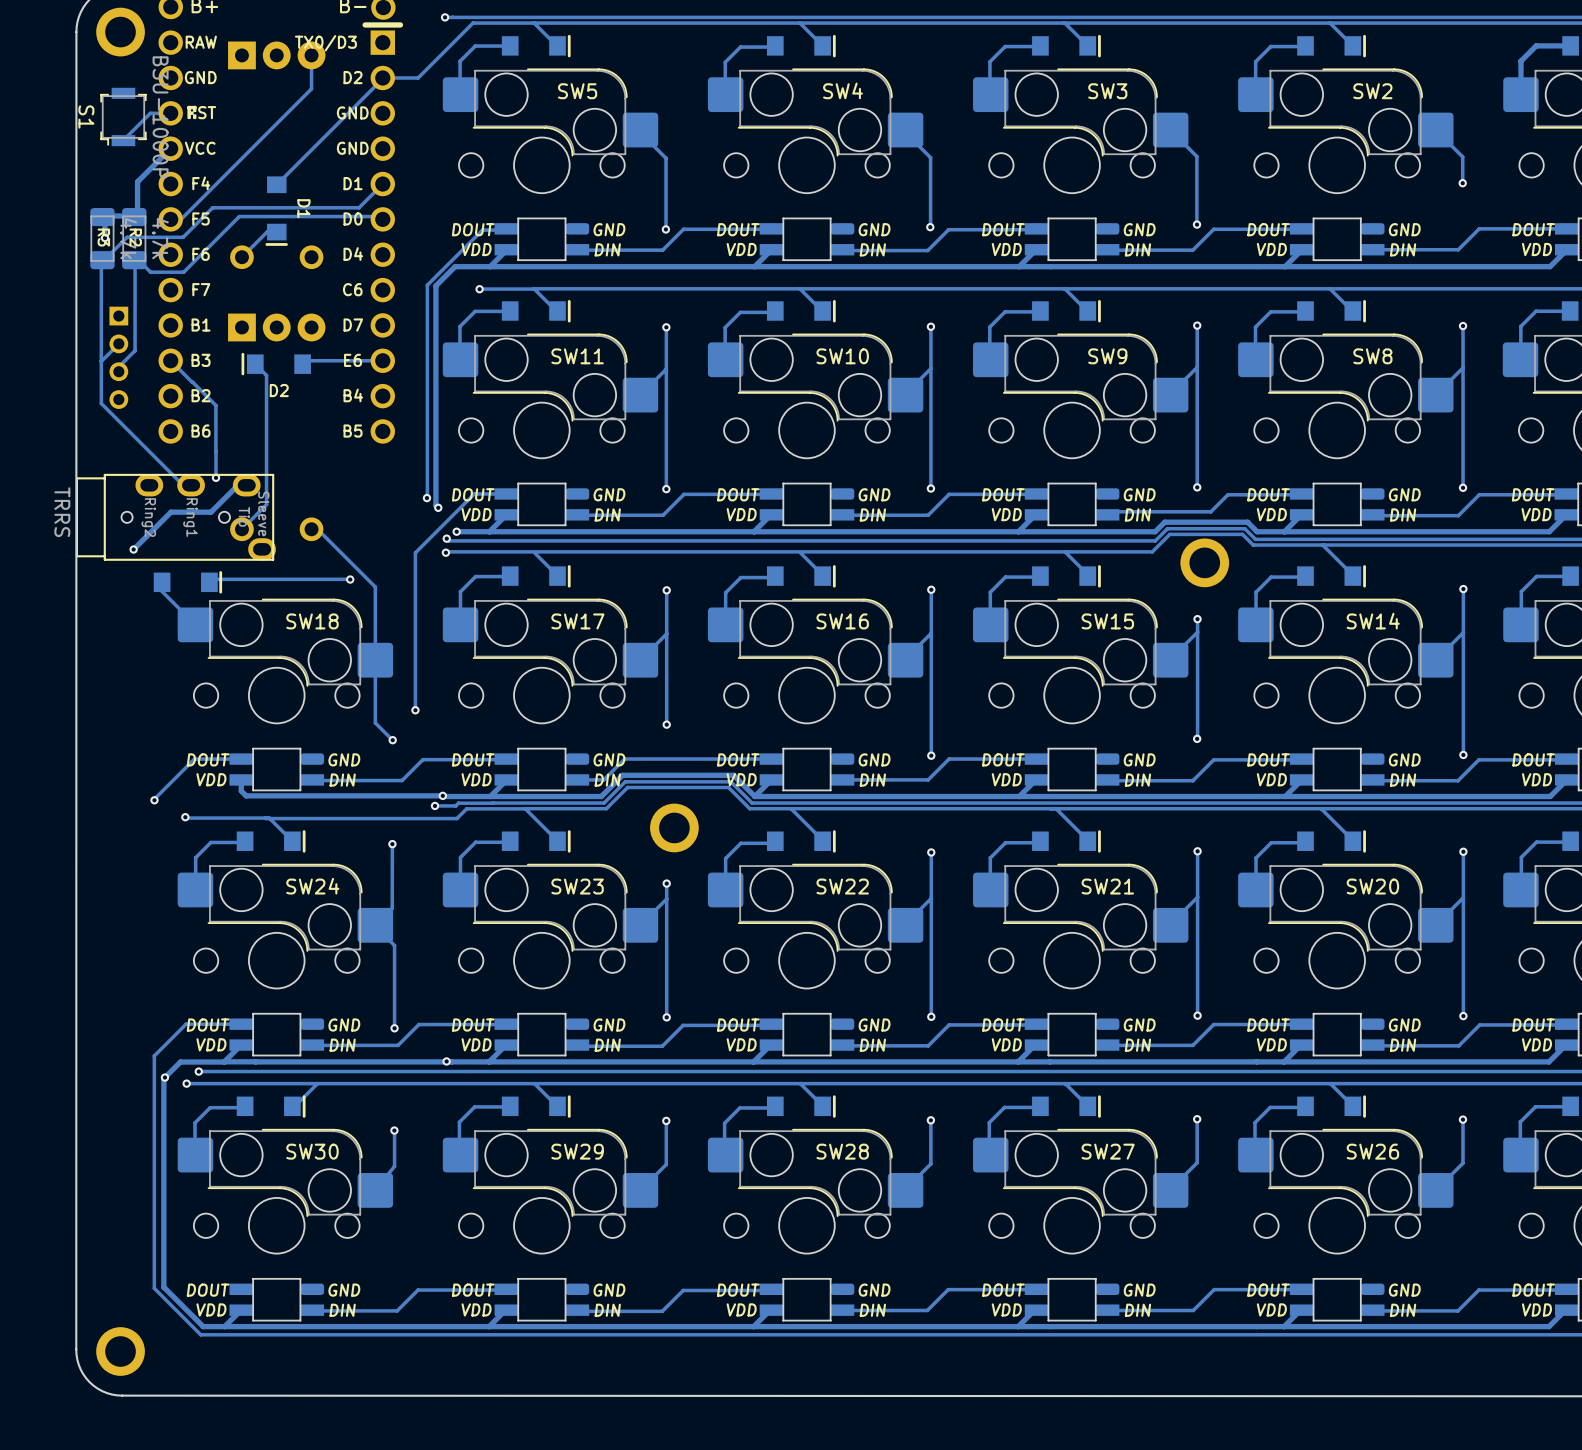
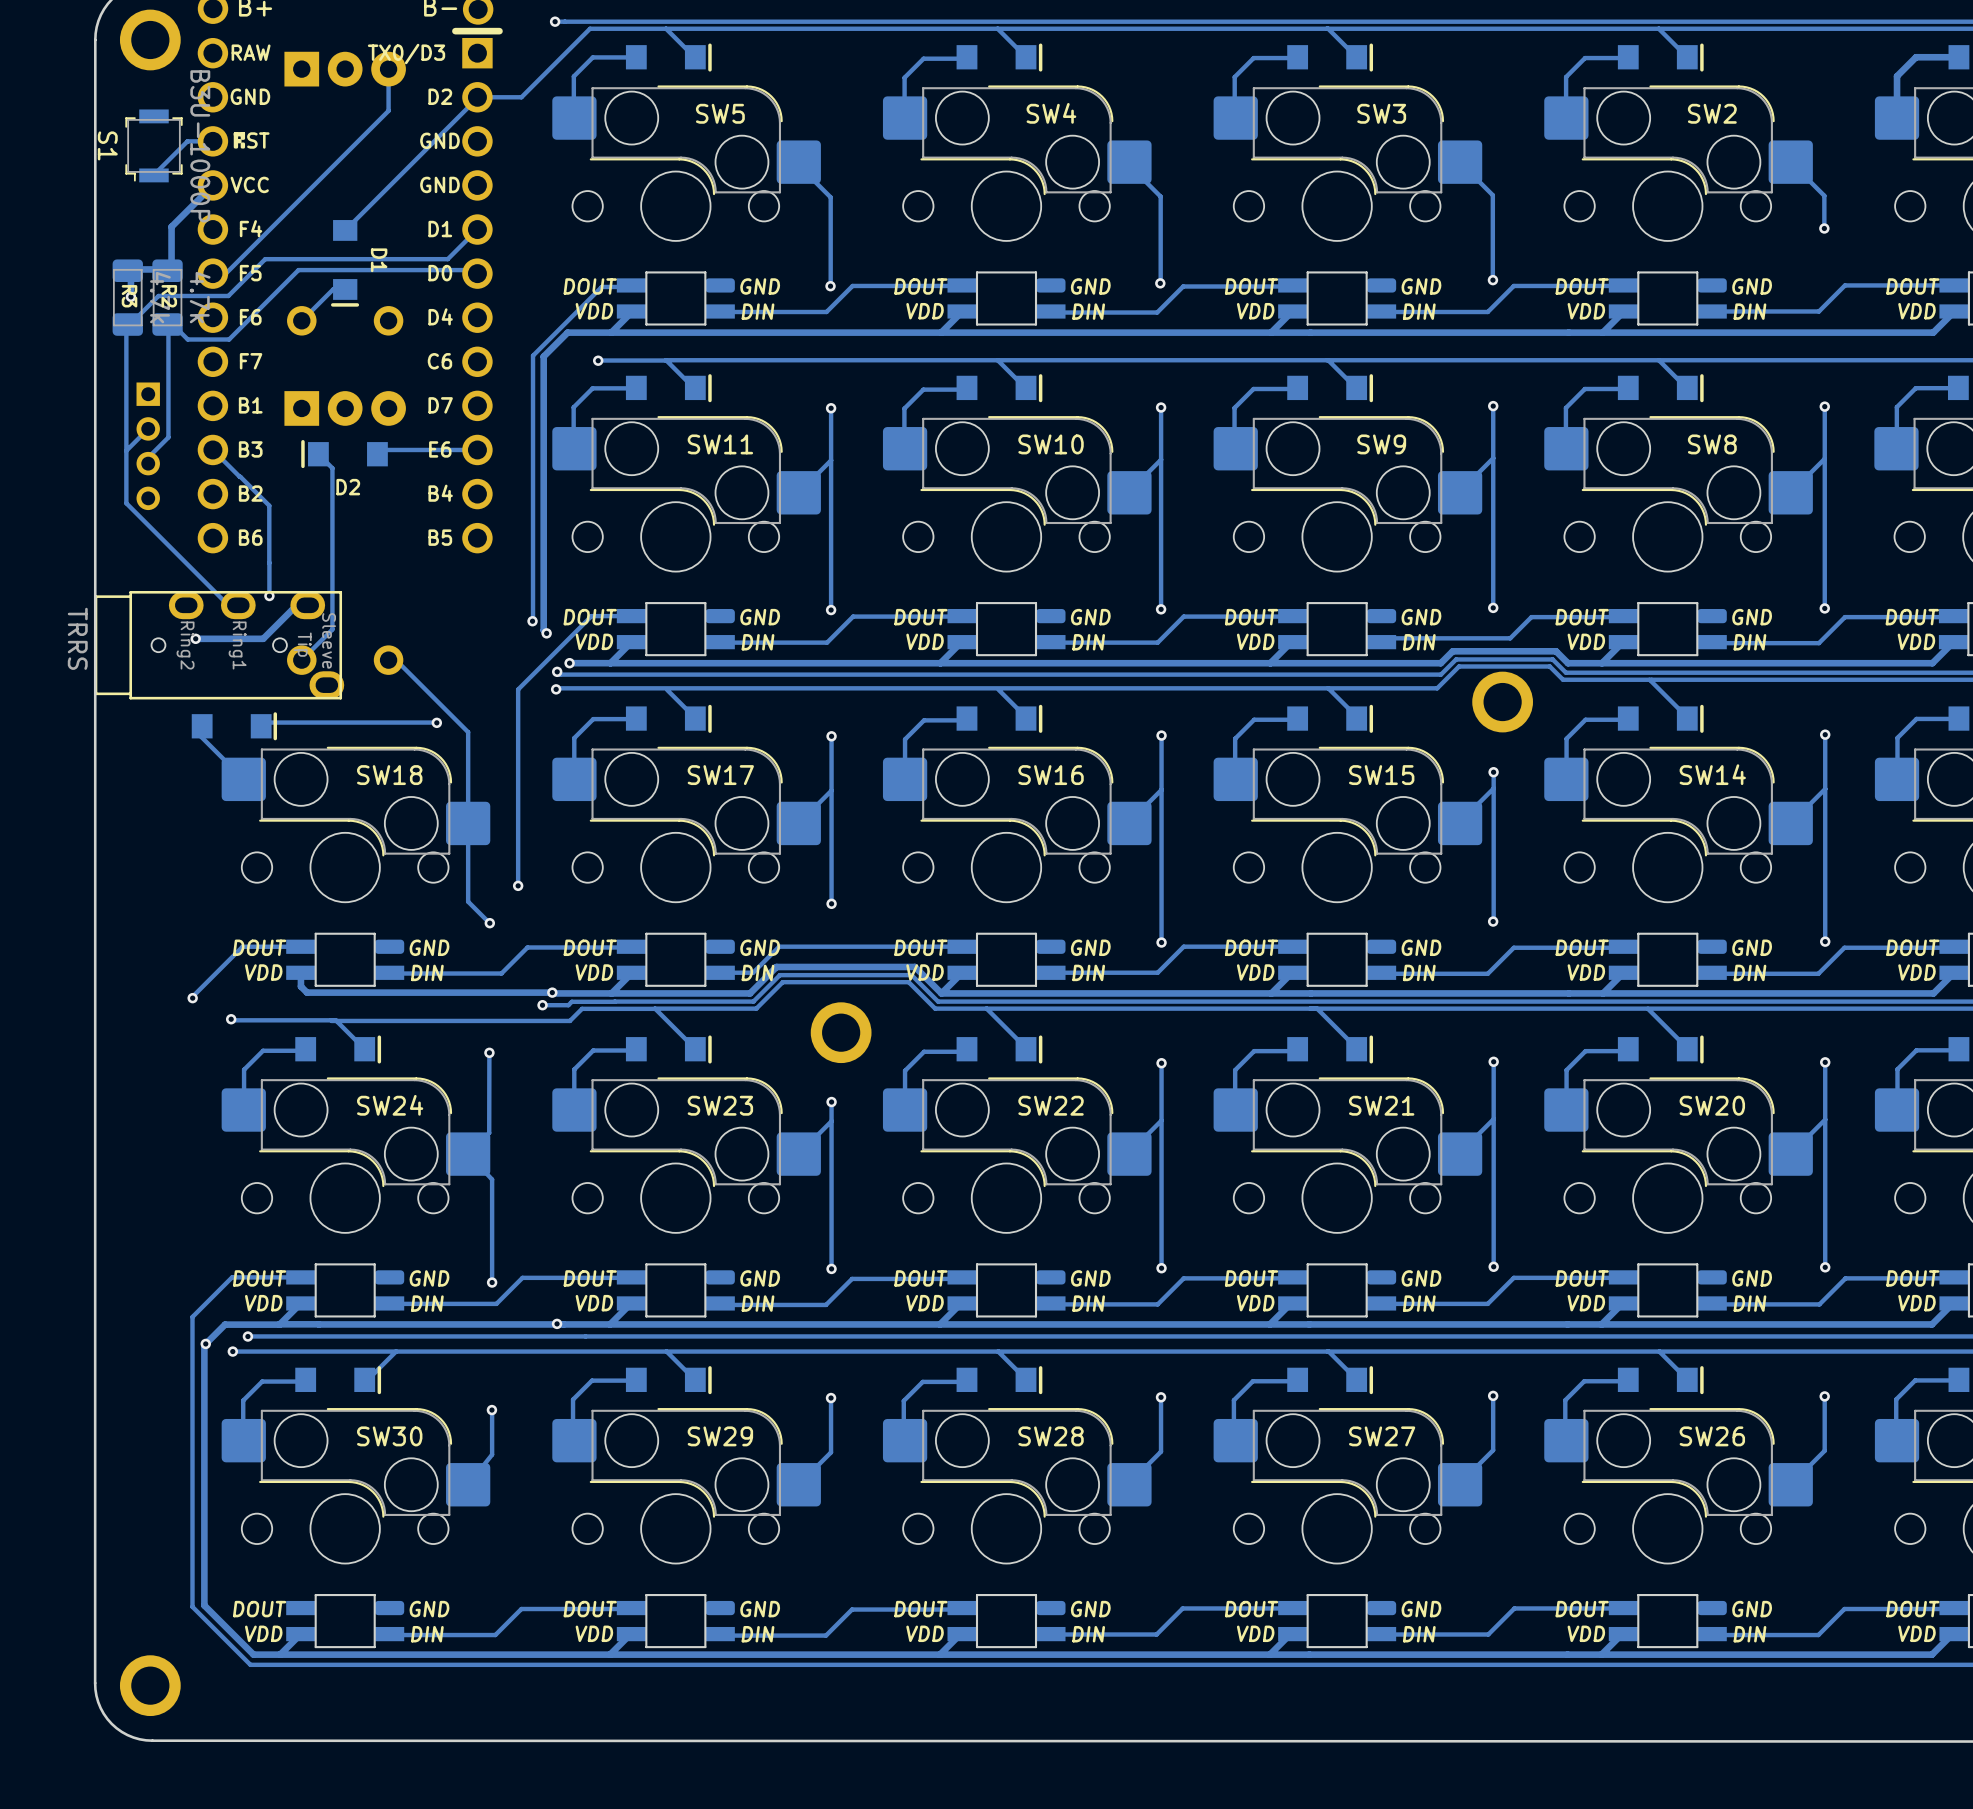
track: (170, 512) (133, 549) -> (213, 638) (195, 638)
via position: (133, 549) -> (195, 638)

